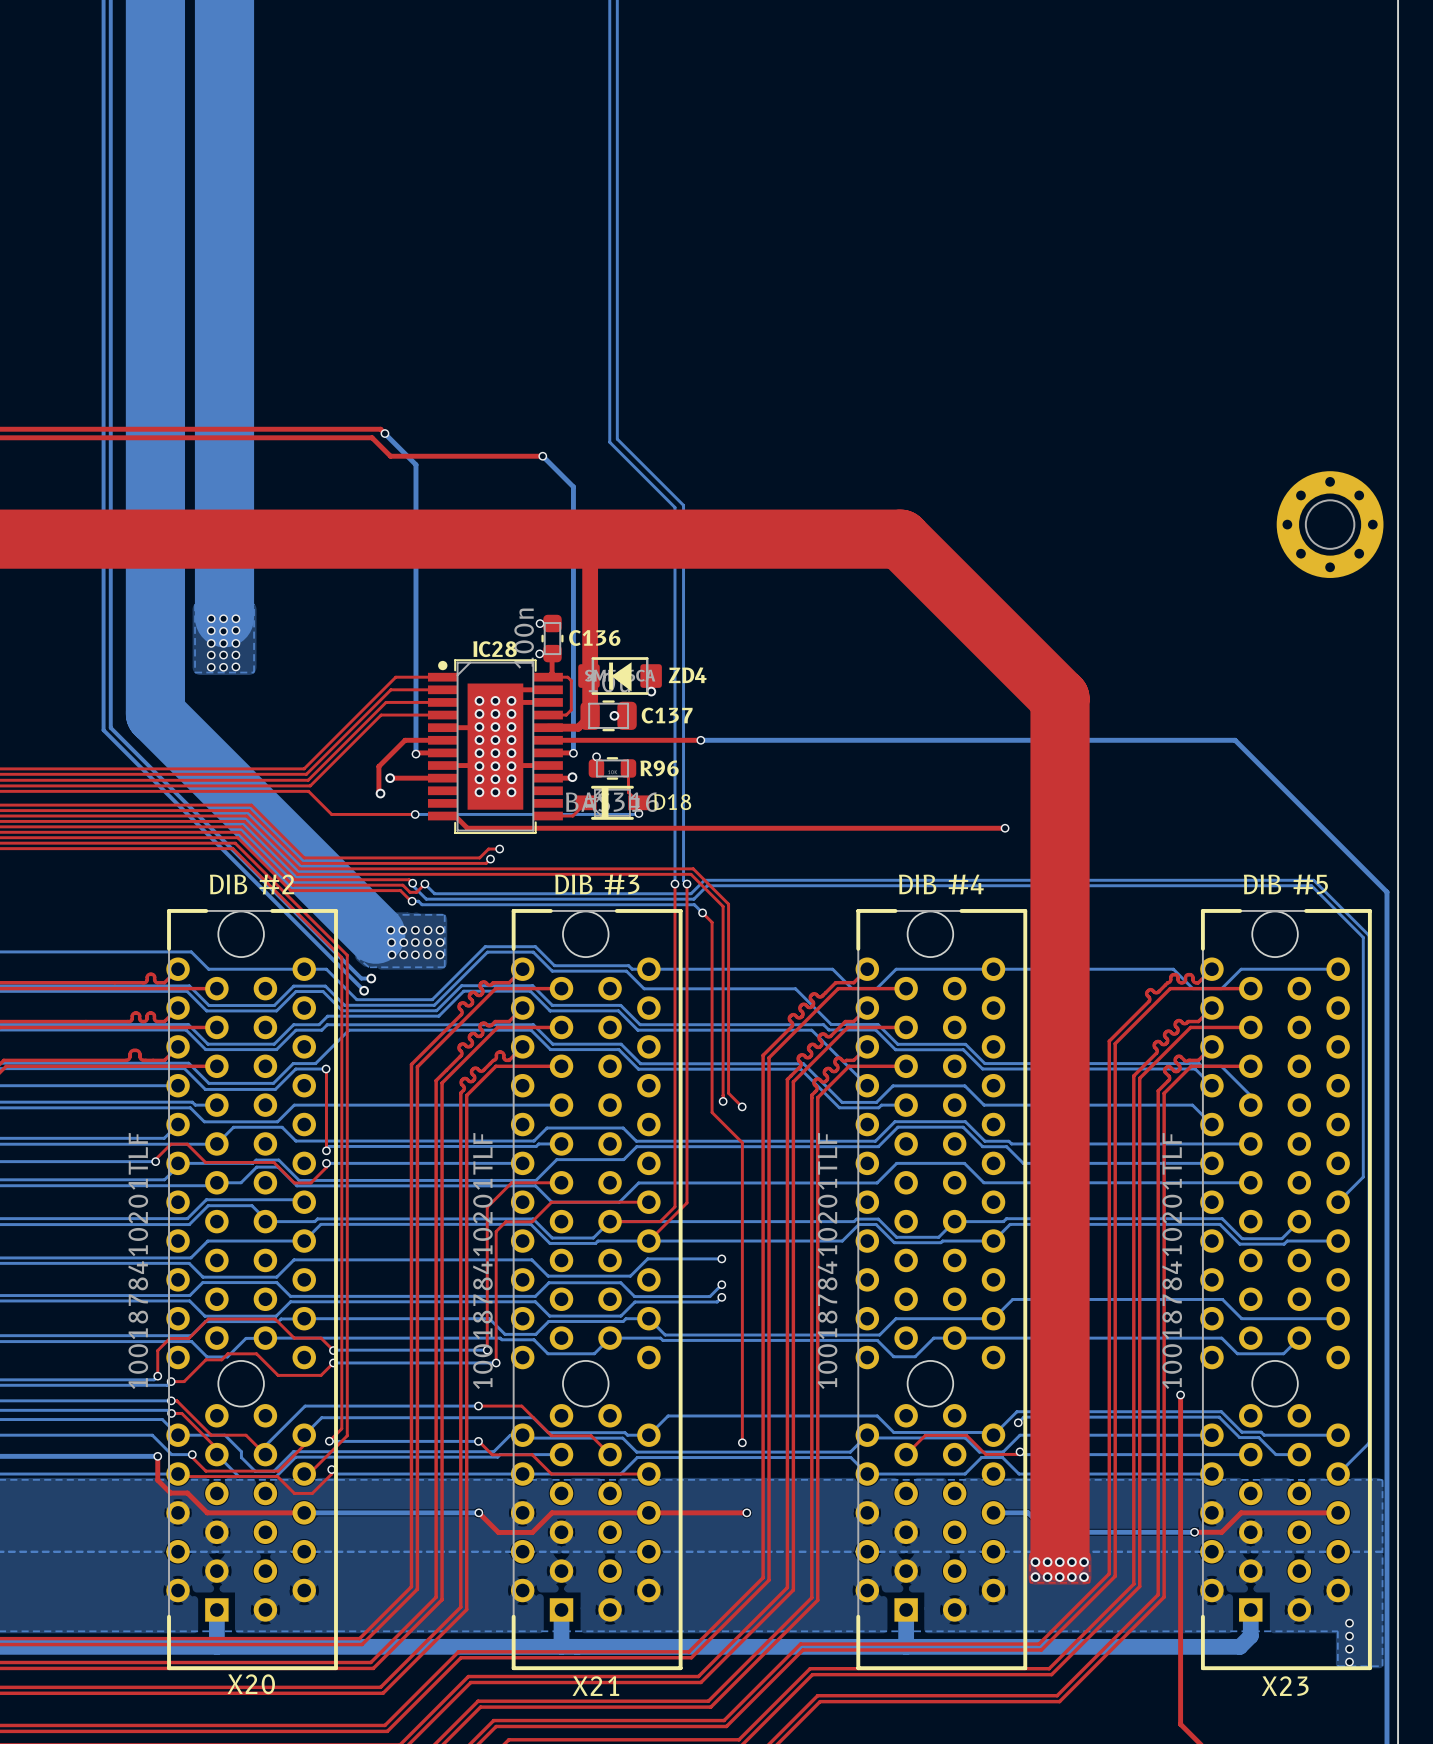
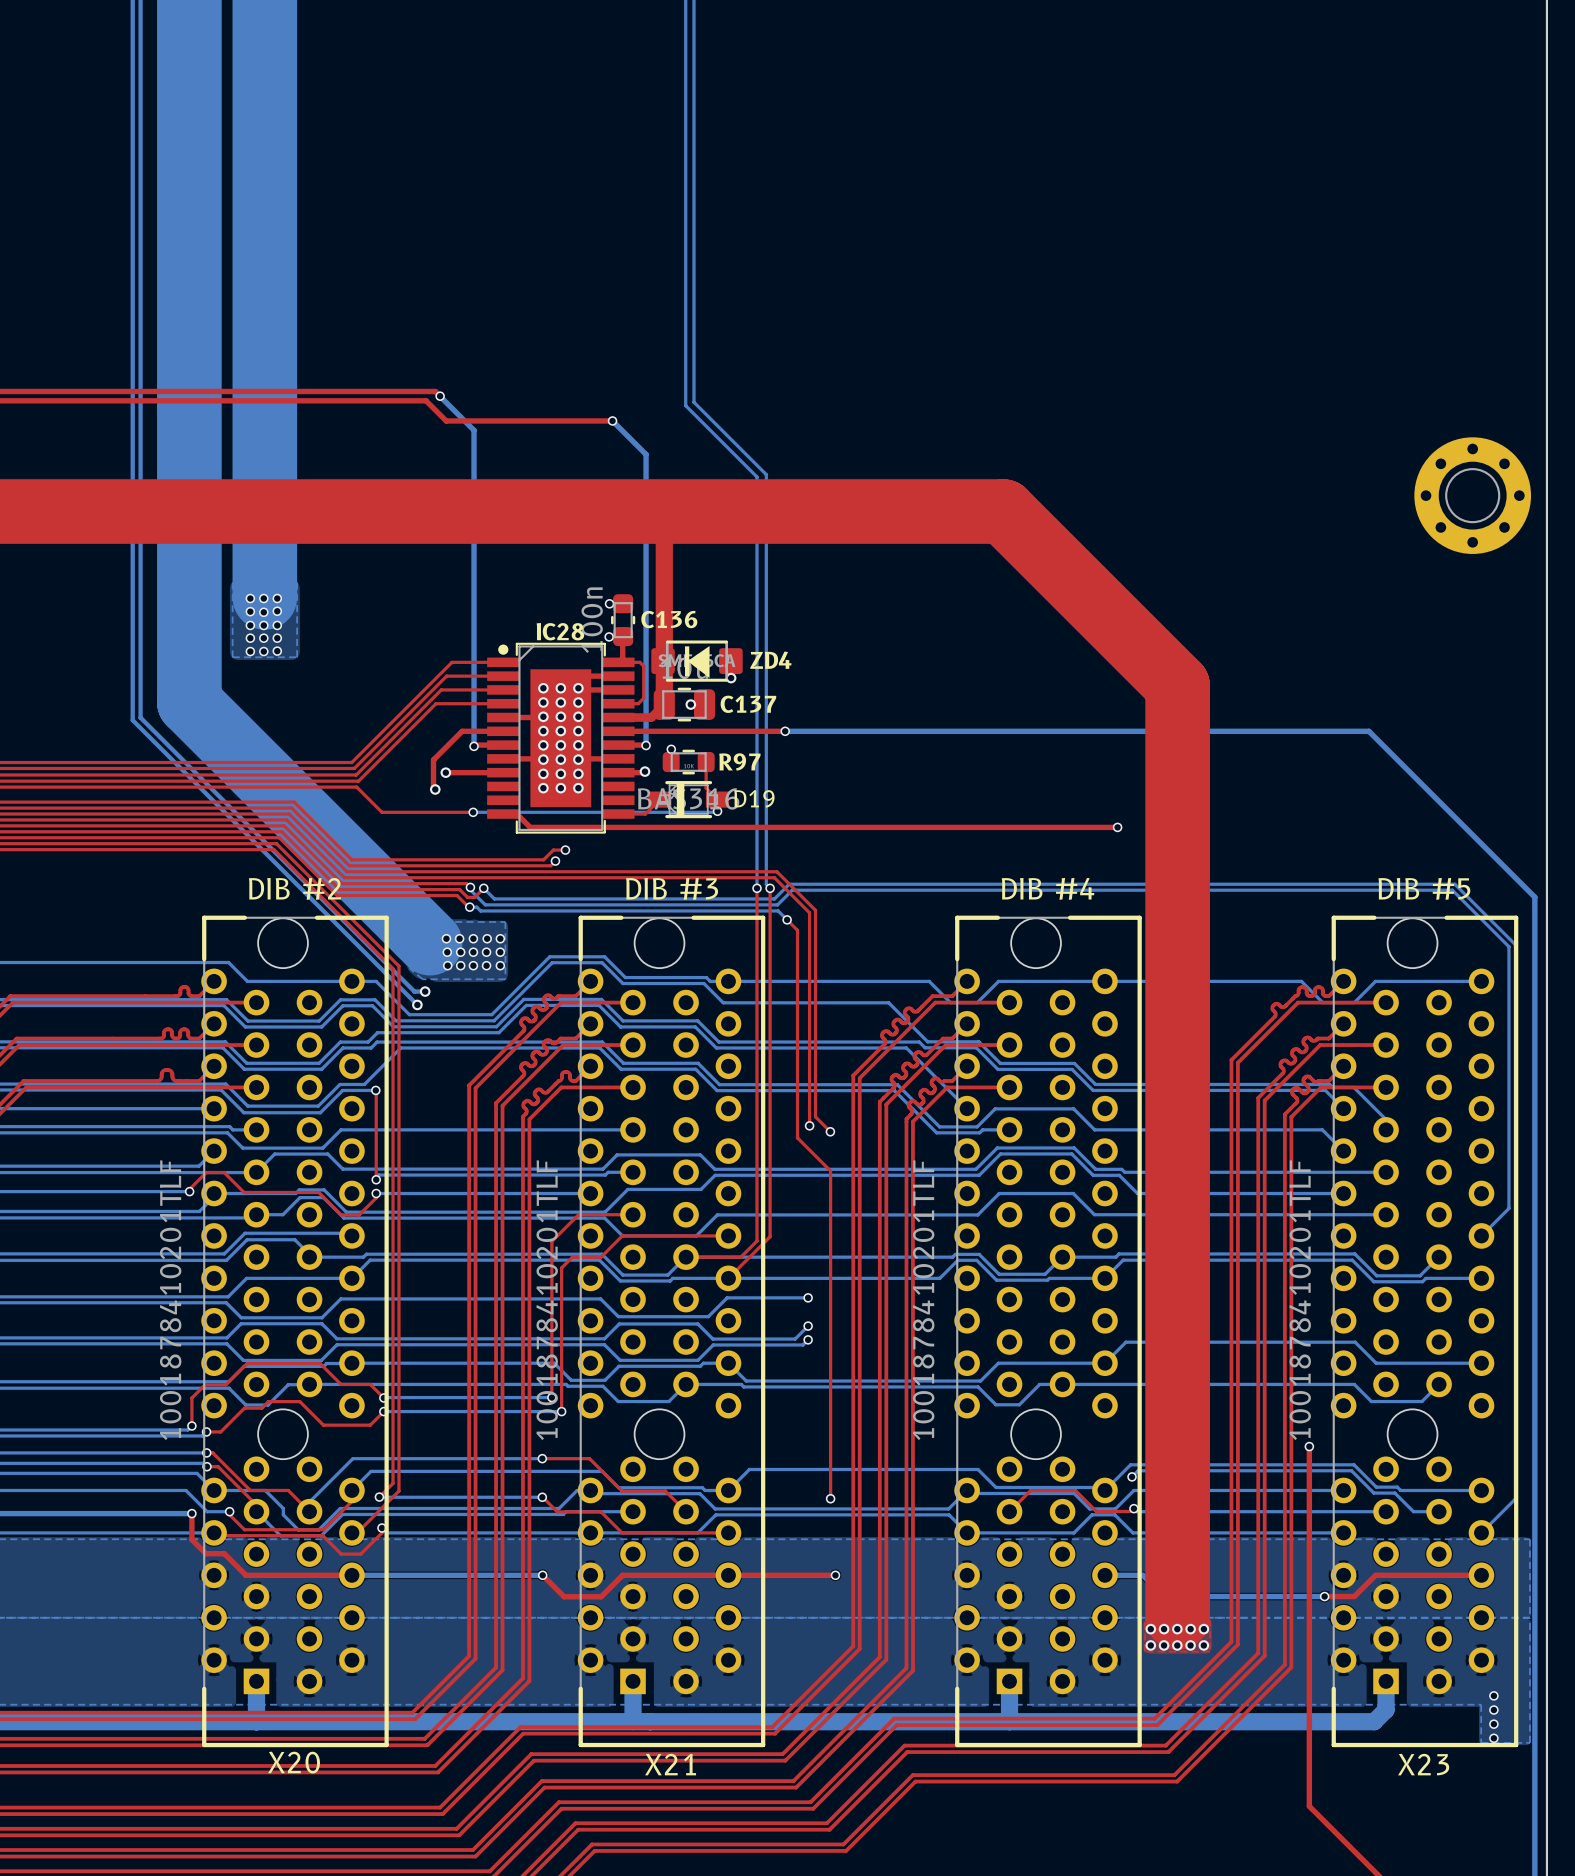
R96 name: R96 (659, 768) -> R97 (739, 761)
D18 name: D18 (672, 802) -> D19 (754, 798)

